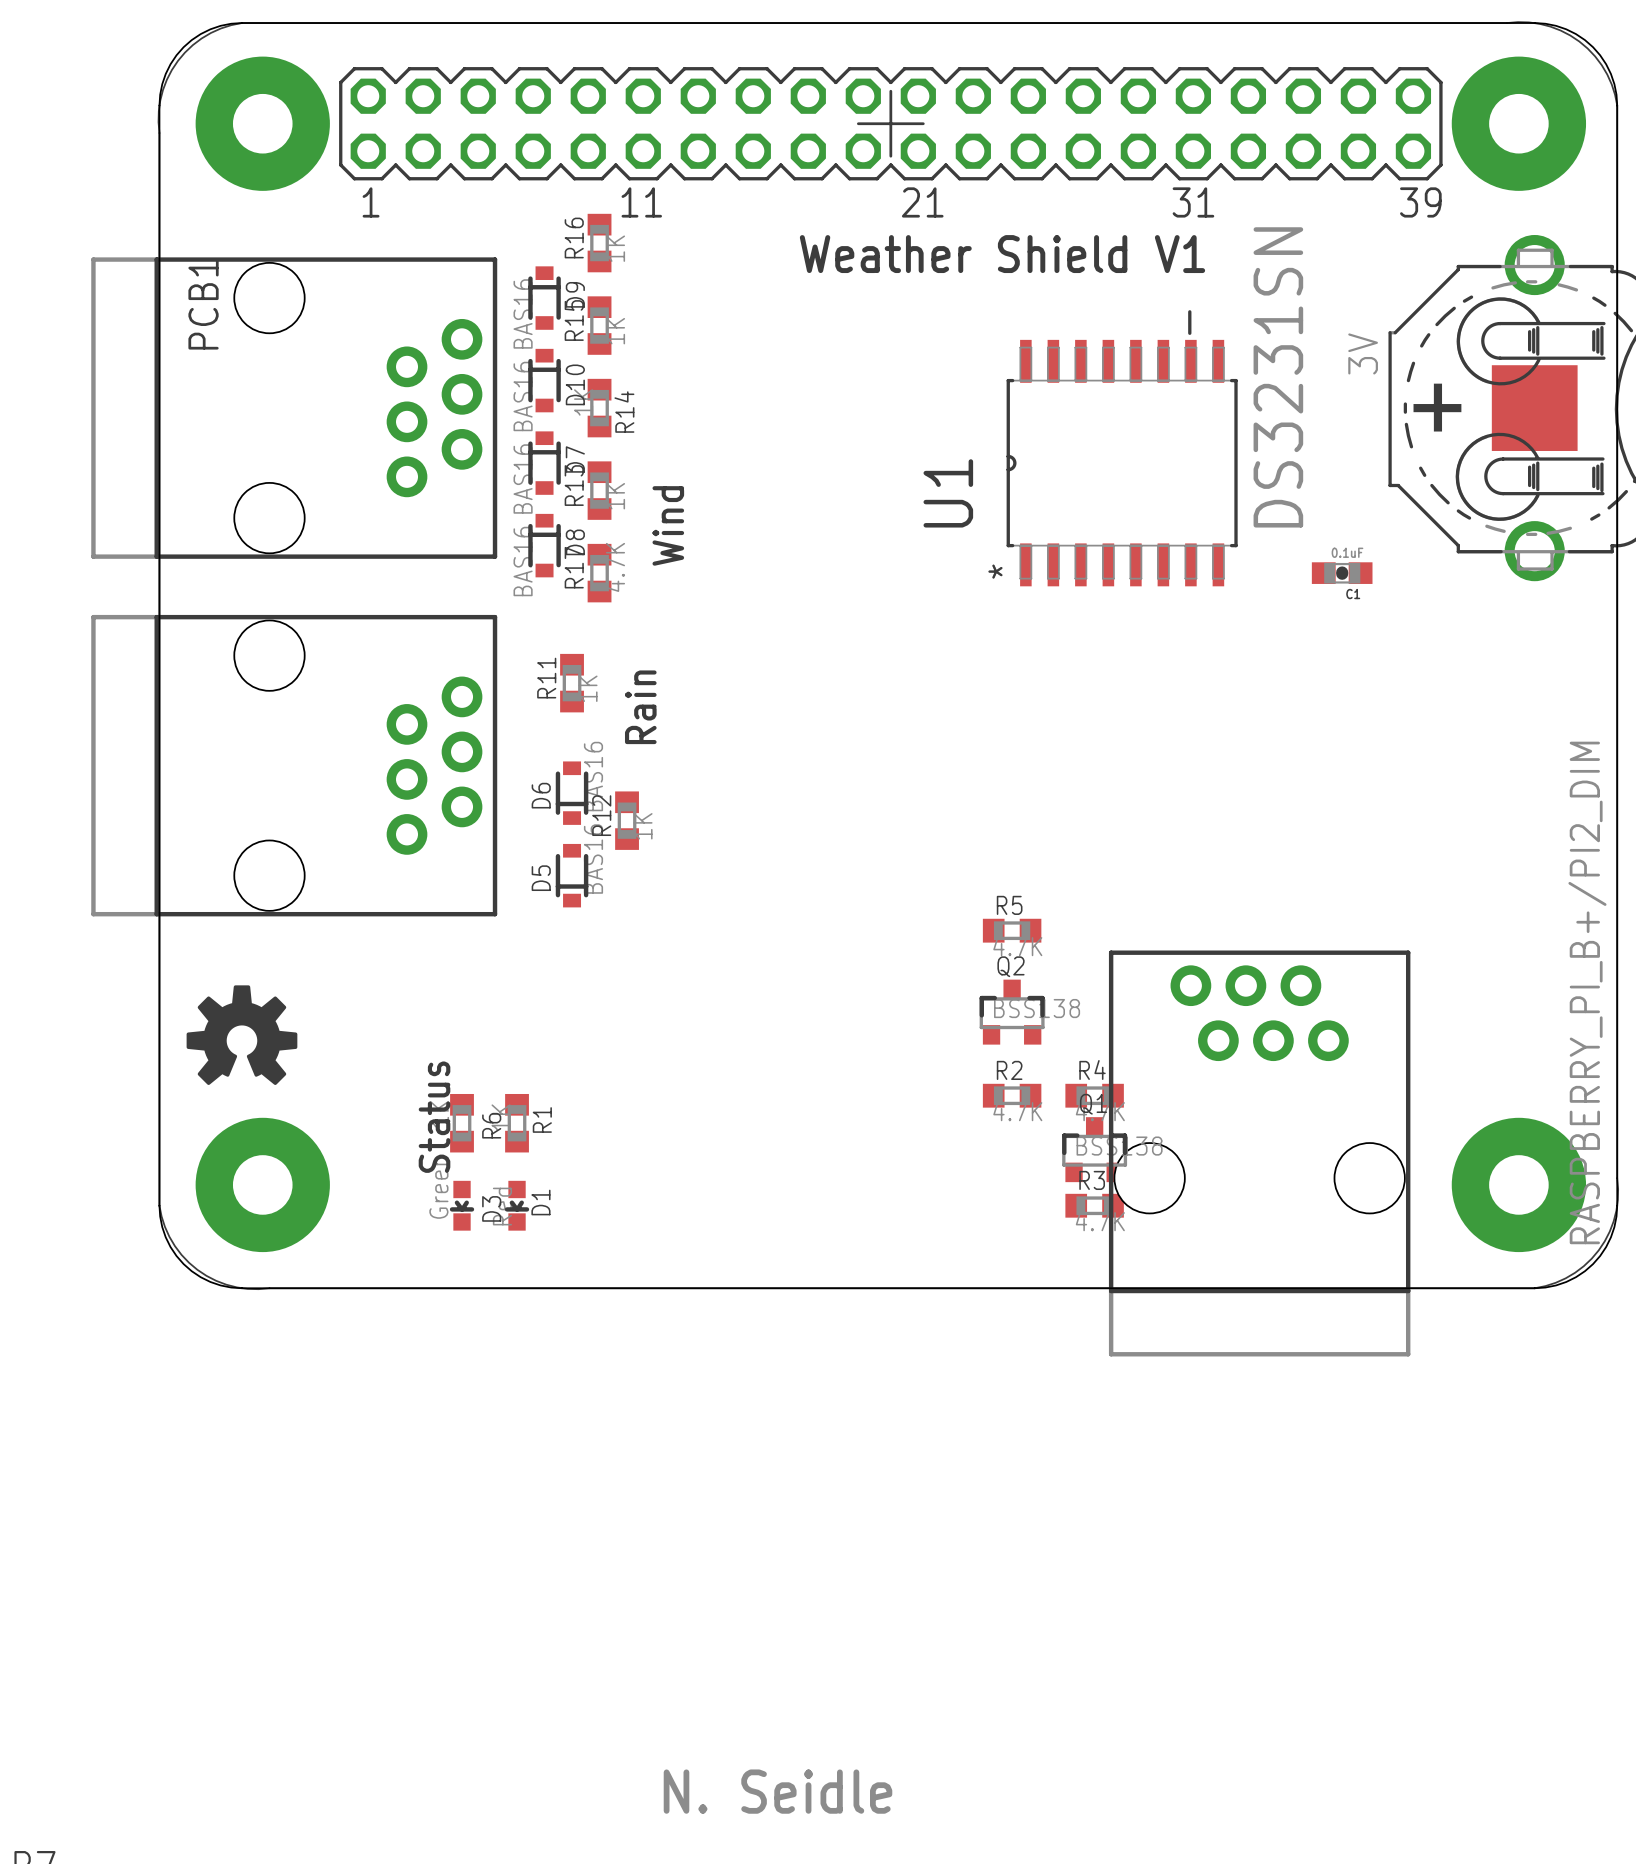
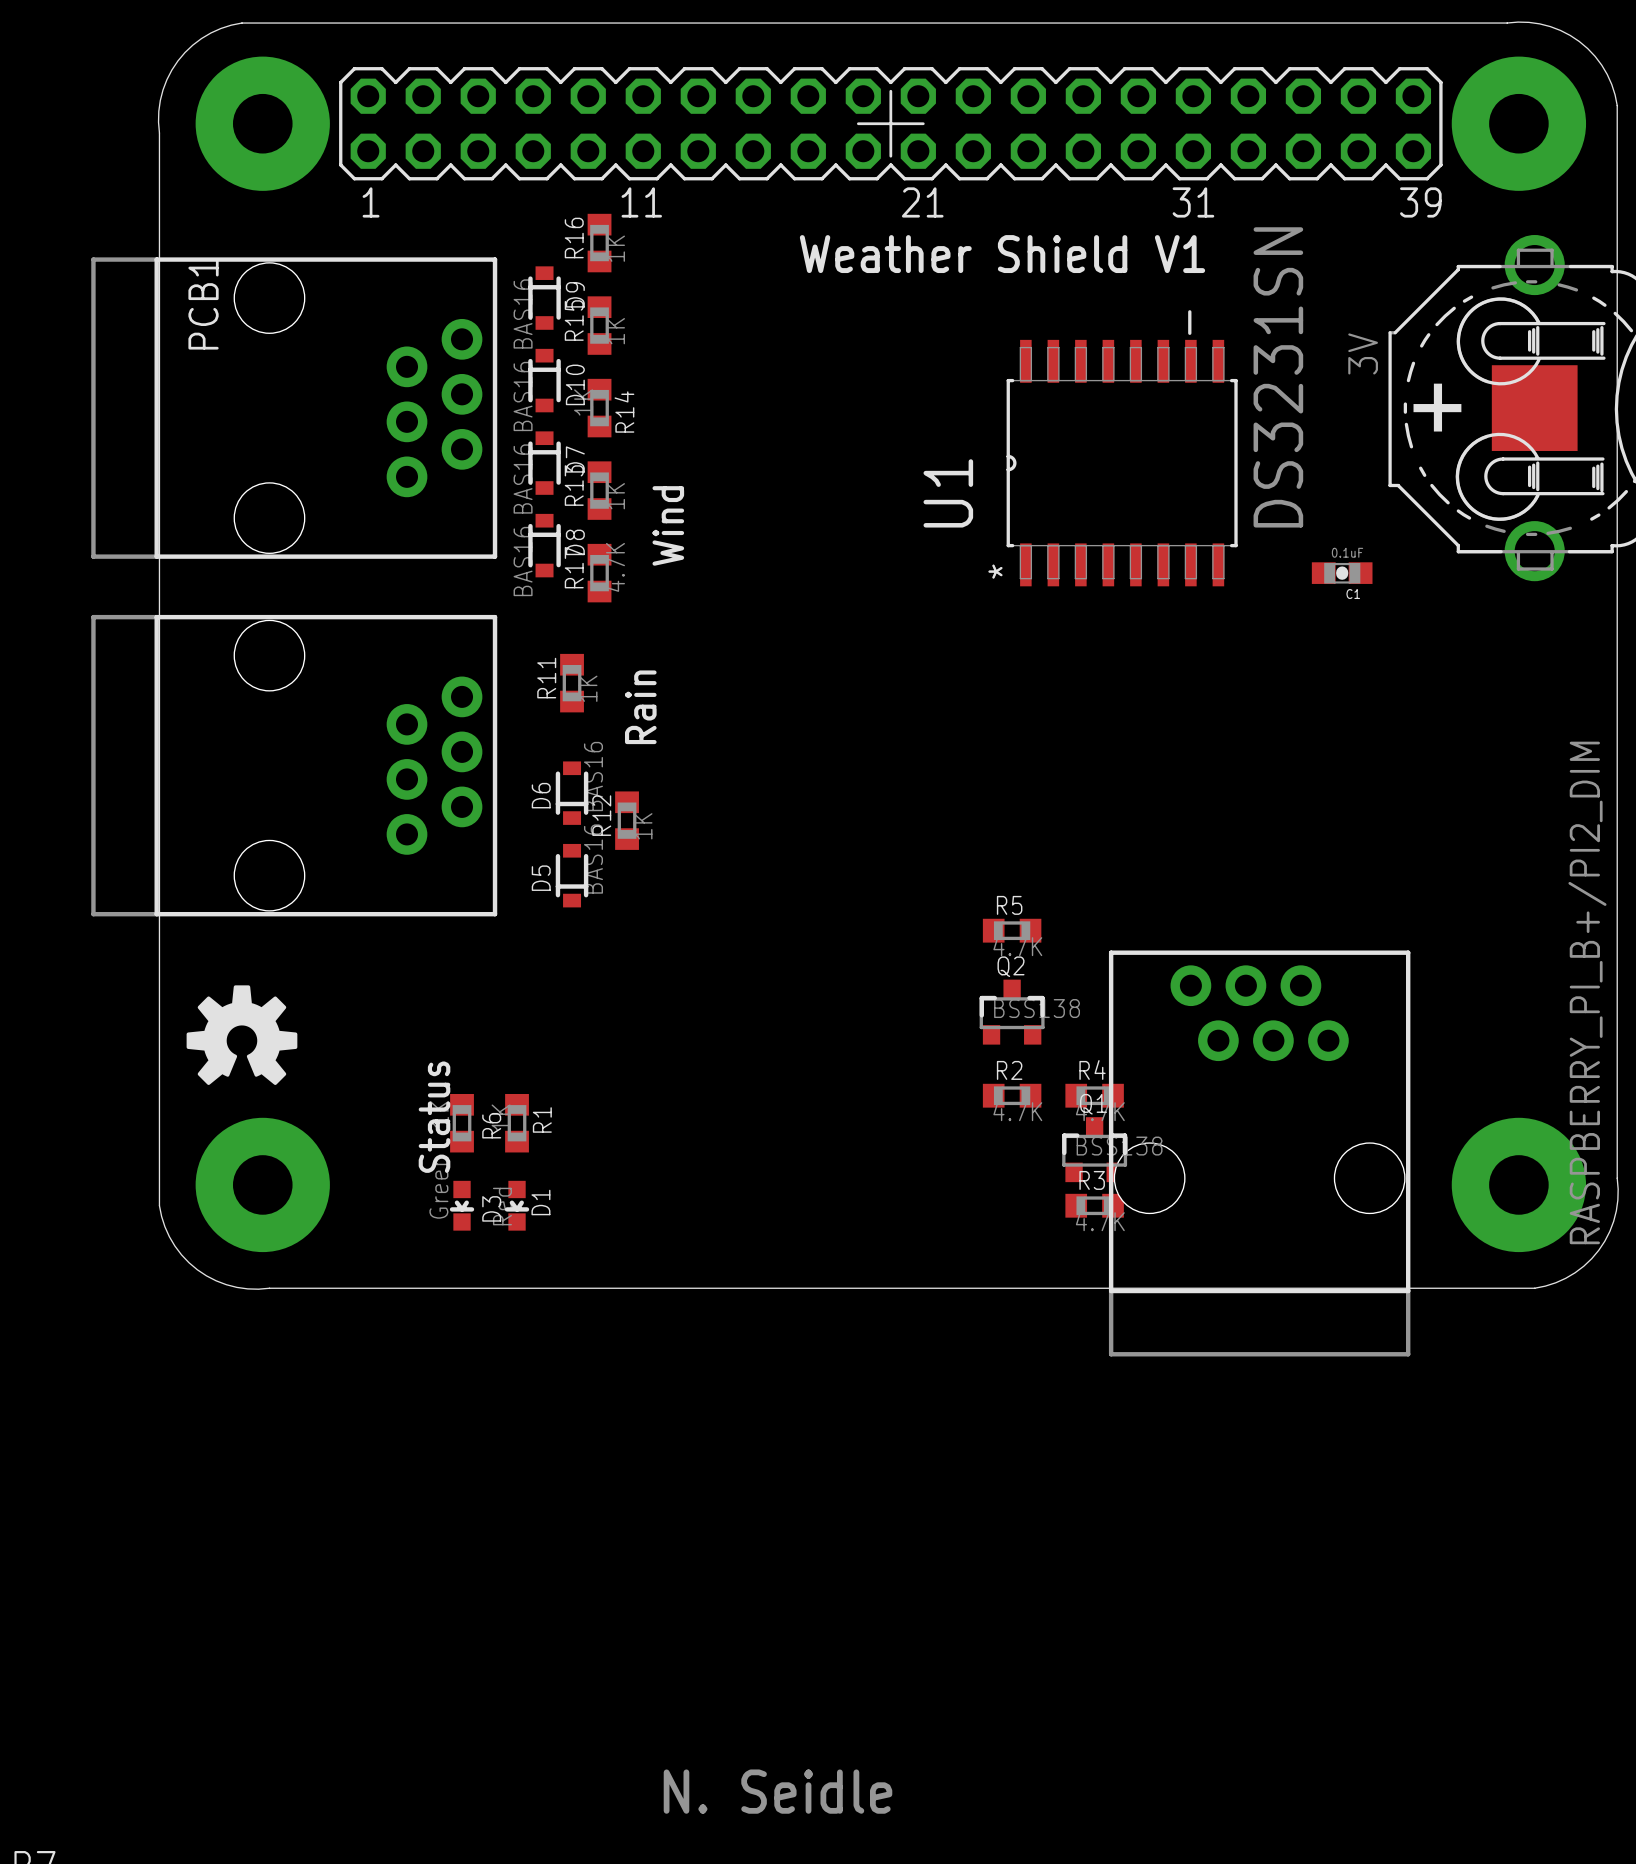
board edge: (241, 23) (1534, 23) (1566, 29) (1593, 47) (1610, 73) (1617, 105) (1617, 1205) (1610, 1237) (1593, 1264) (1566, 1281) (1534, 1288) (241, 1288) (210, 1281) (183, 1264) (165, 1237) (159, 1205) (159, 105) (165, 73) (183, 47) (210, 29) (241, 23) -> none

